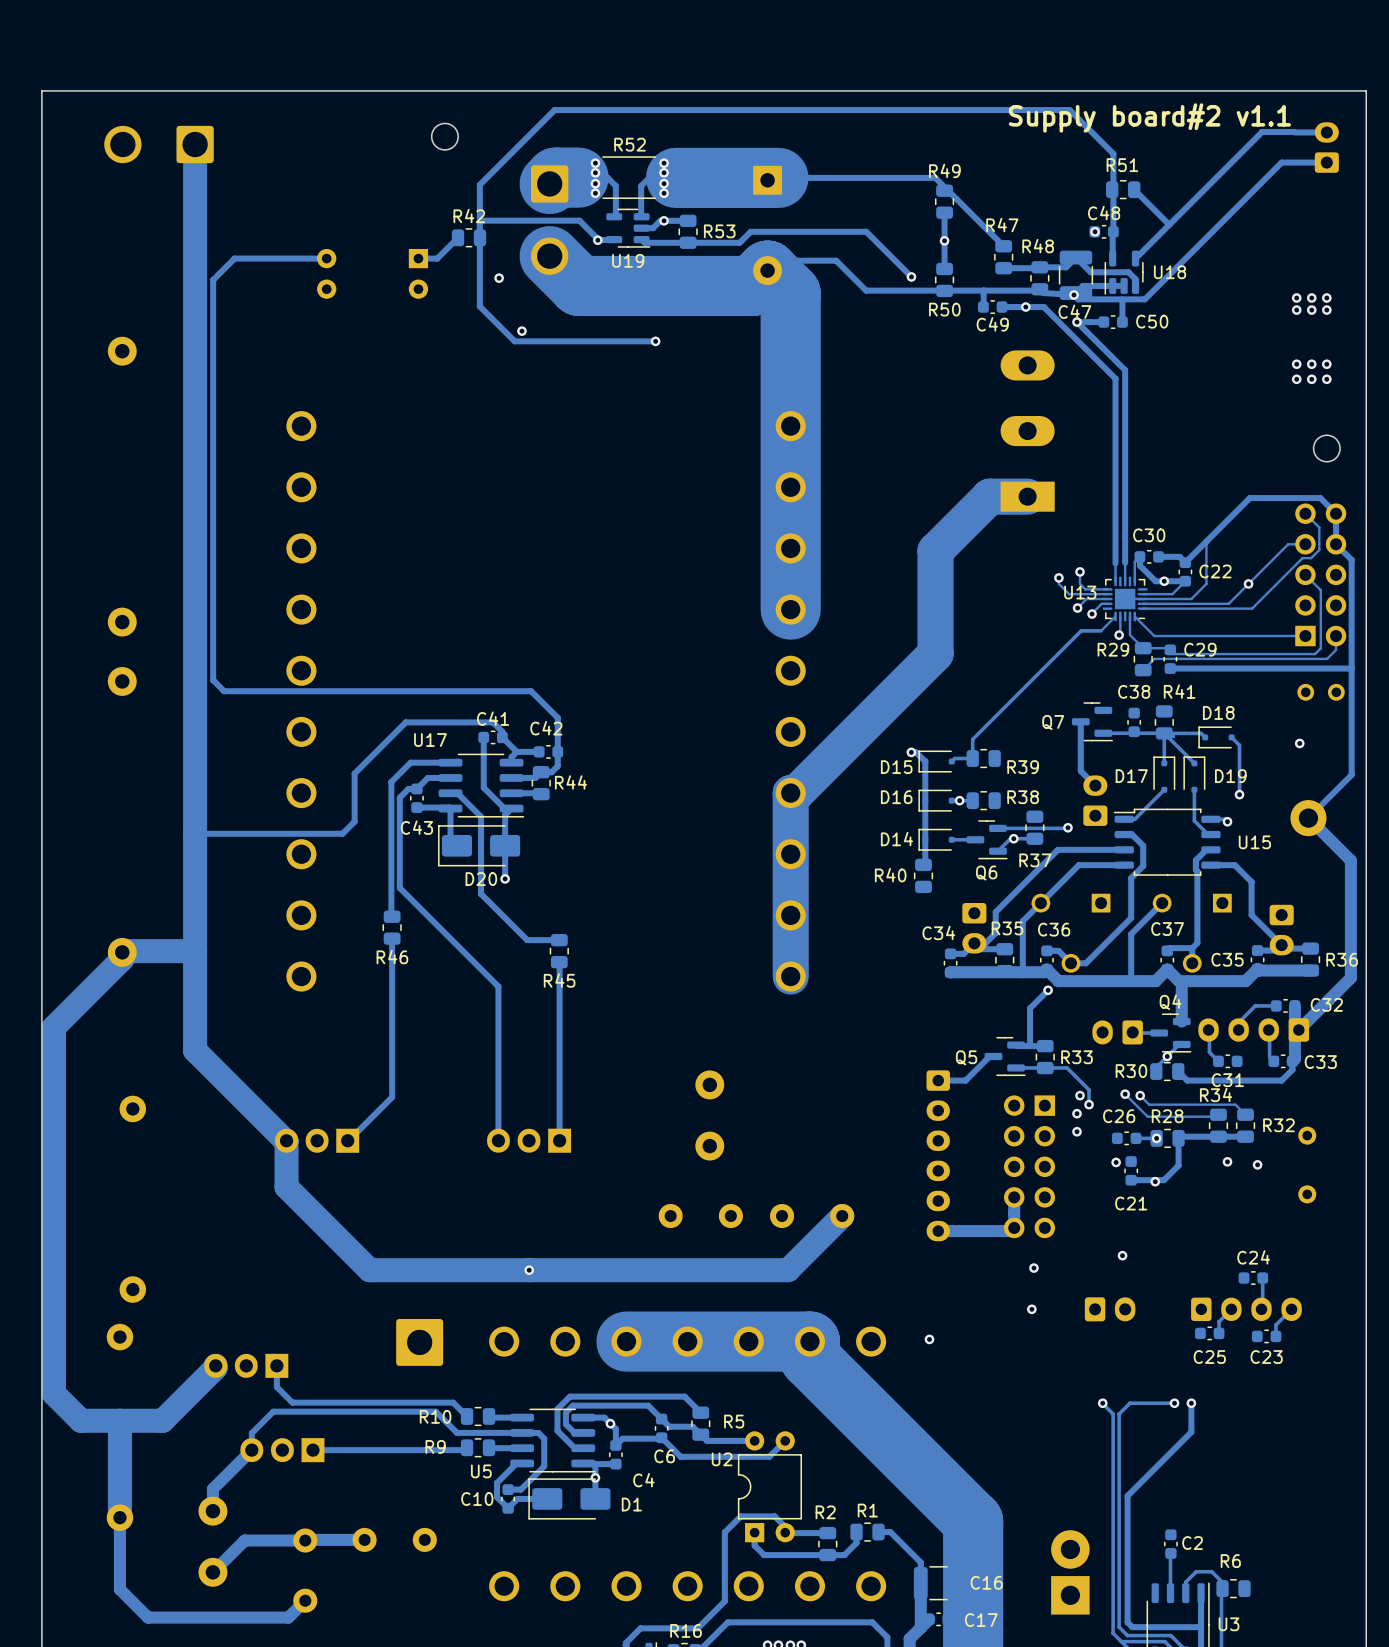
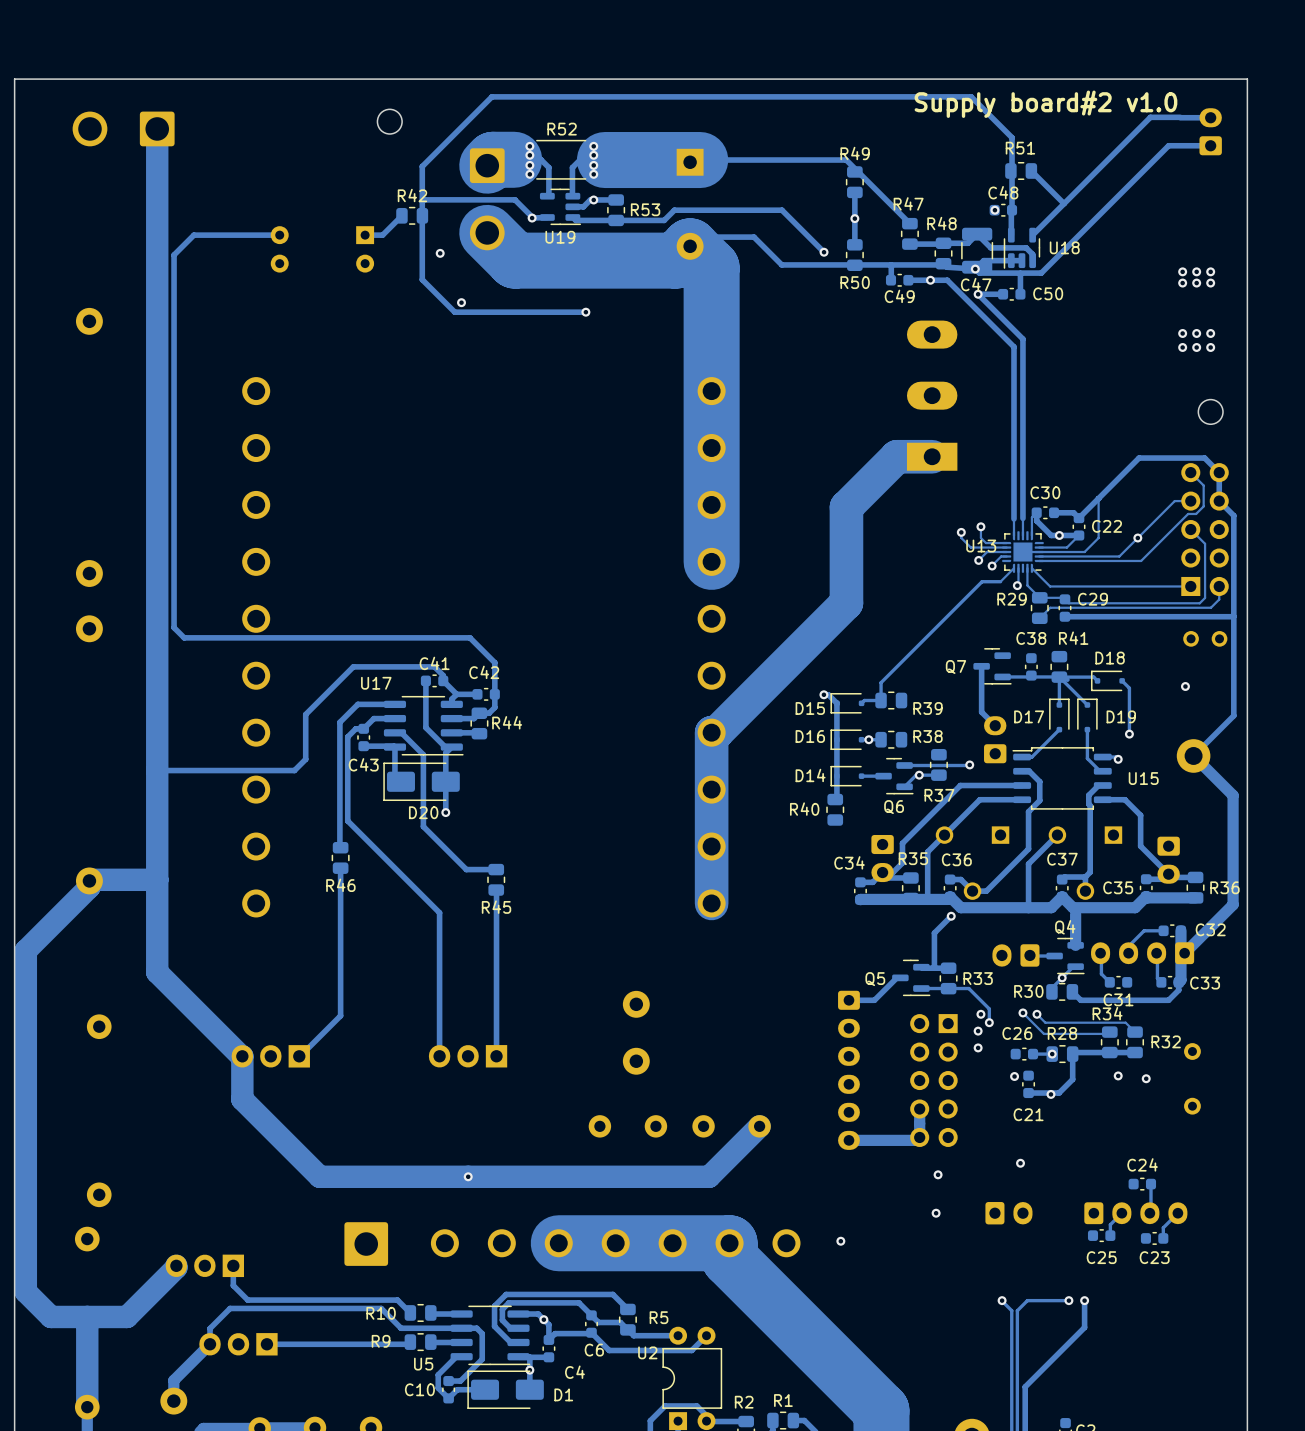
text: Supply board#2 v1.1 (1149, 117) -> Supply board#2 v1.0 (1045, 104)

